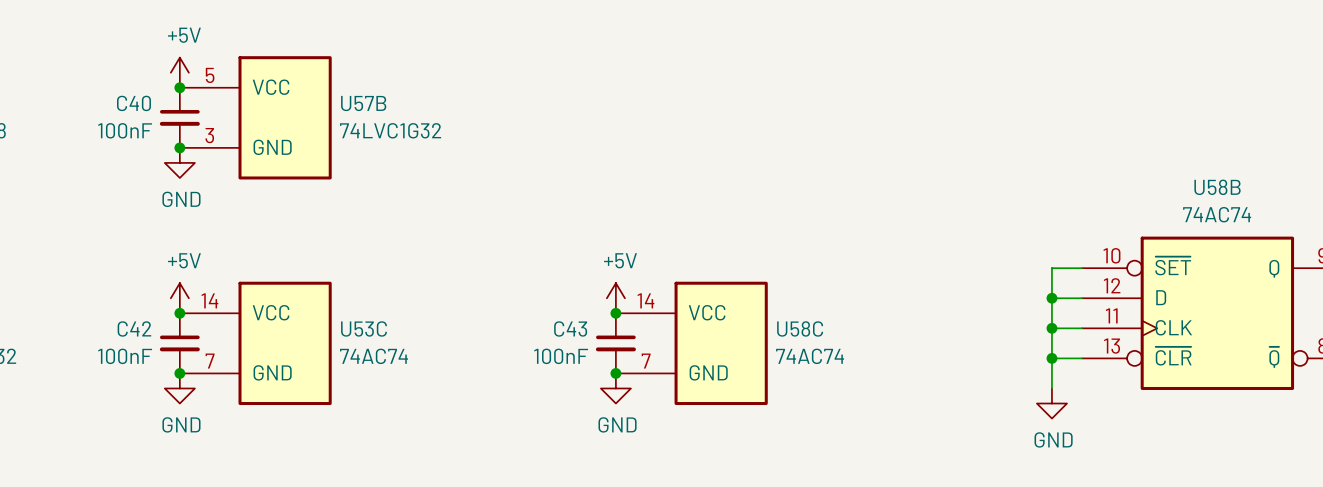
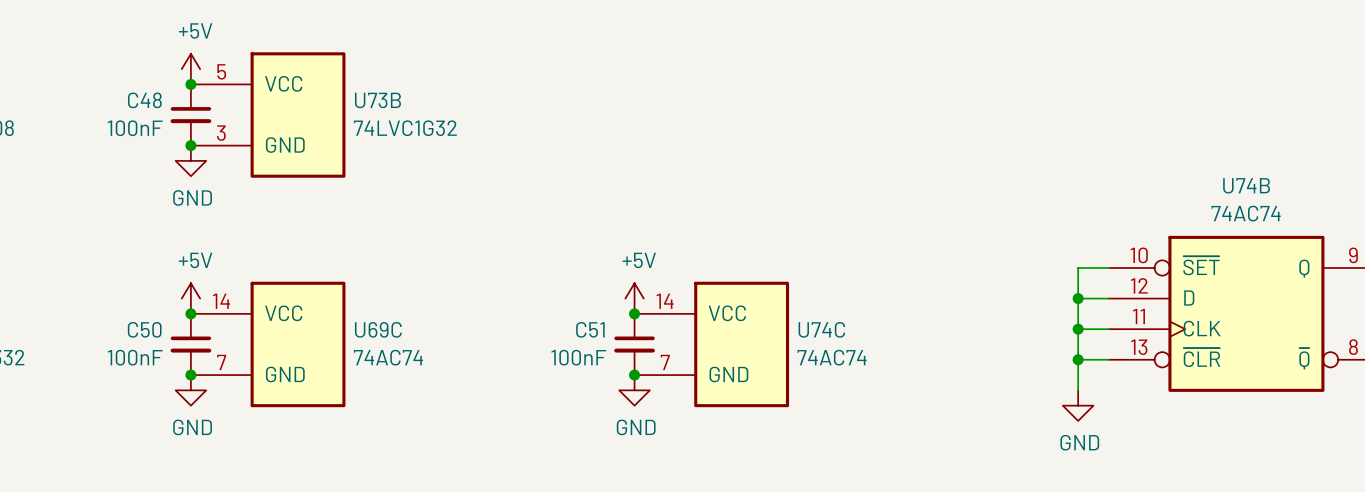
C40 name: C40 (133, 103) -> C48 (144, 100)
U57B name: U57B (363, 103) -> U73B (377, 100)
U58B name: U58B (1217, 187) -> U74B (1246, 185)
C42 name: C42 (134, 328) -> C50 (144, 329)
U53C name: U53C (363, 328) -> U69C (378, 329)
C43 name: C43 (570, 328) -> C51 (590, 329)
U58C name: U58C (800, 328) -> U74C (821, 329)

